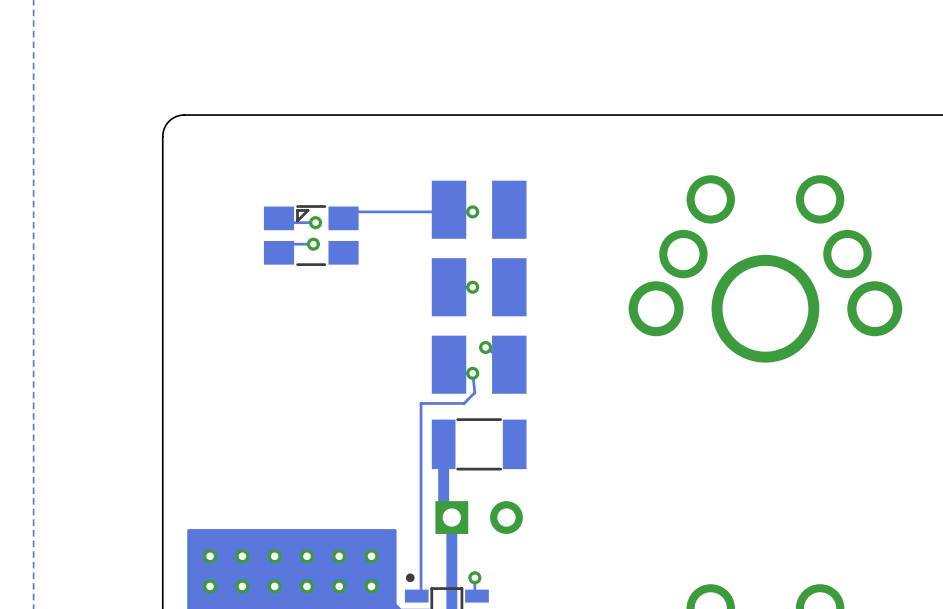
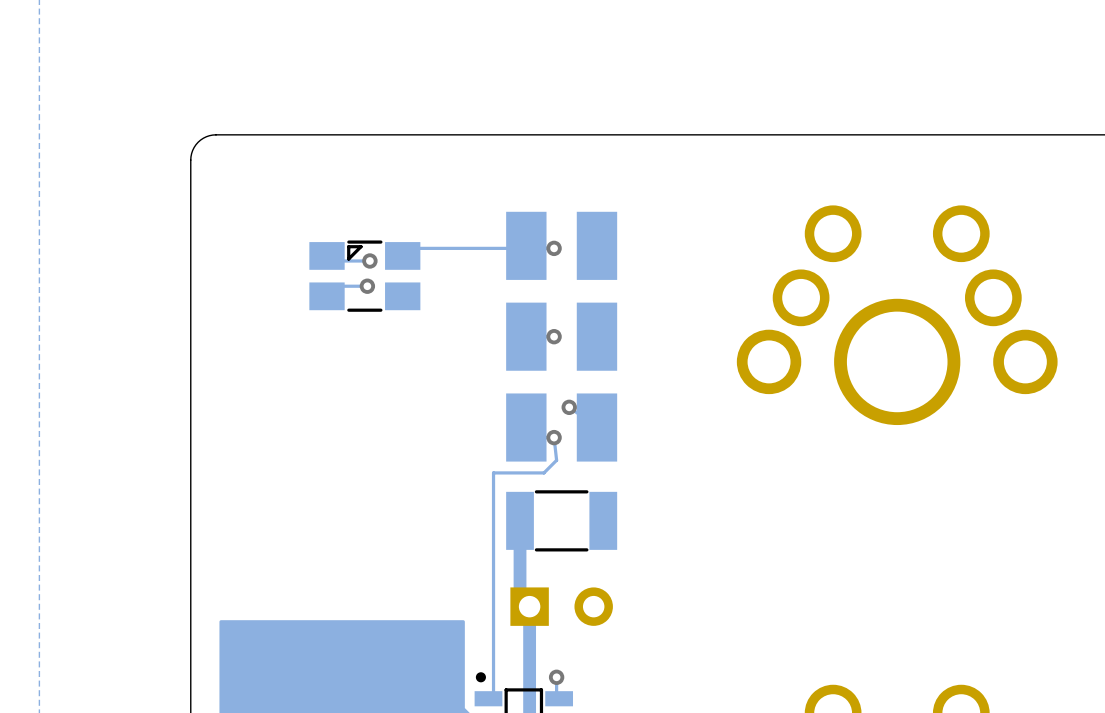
via: (210, 556) -> none
via: (242, 556) -> none
via: (274, 556) -> none
via: (306, 556) -> none
via: (339, 556) -> none
via: (371, 556) -> none
via: (210, 586) -> none
via: (242, 586) -> none
via: (274, 586) -> none
via: (306, 586) -> none
via: (339, 586) -> none
via: (371, 586) -> none

